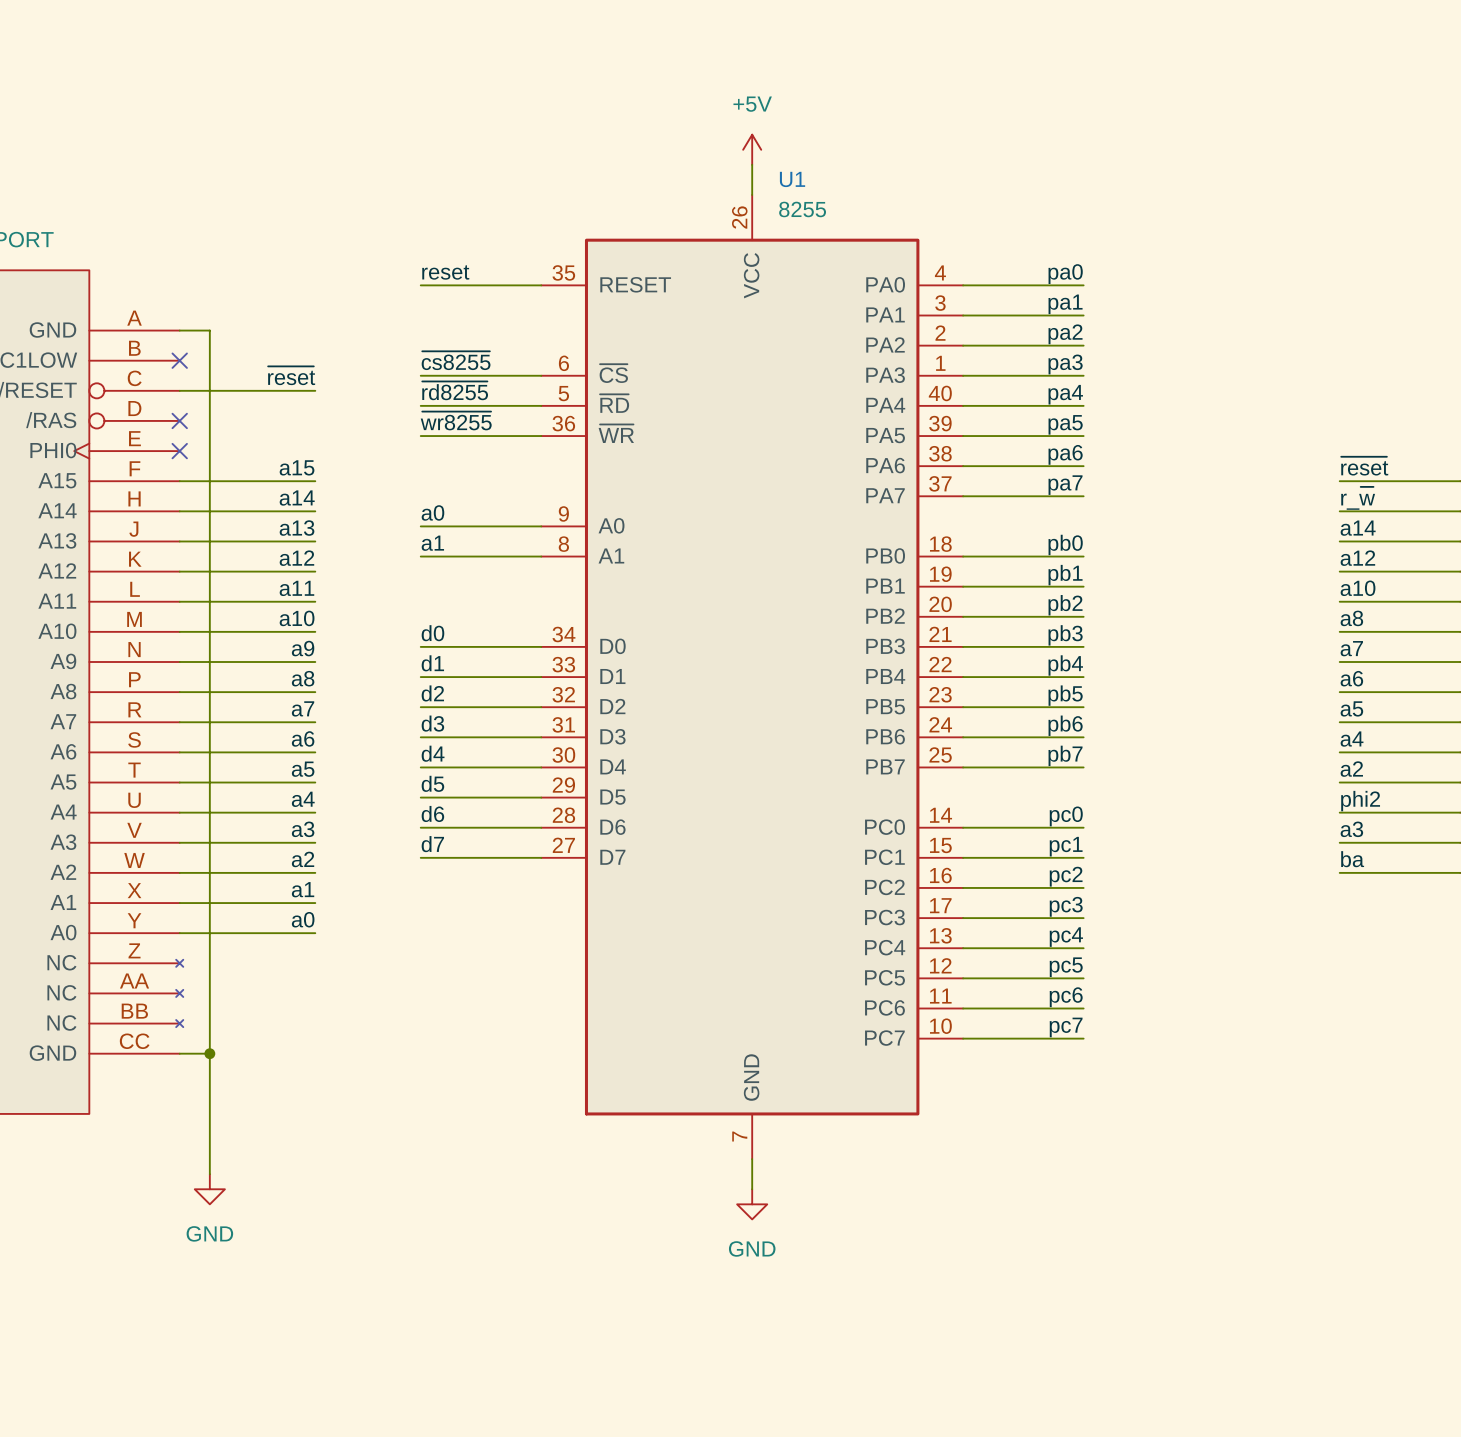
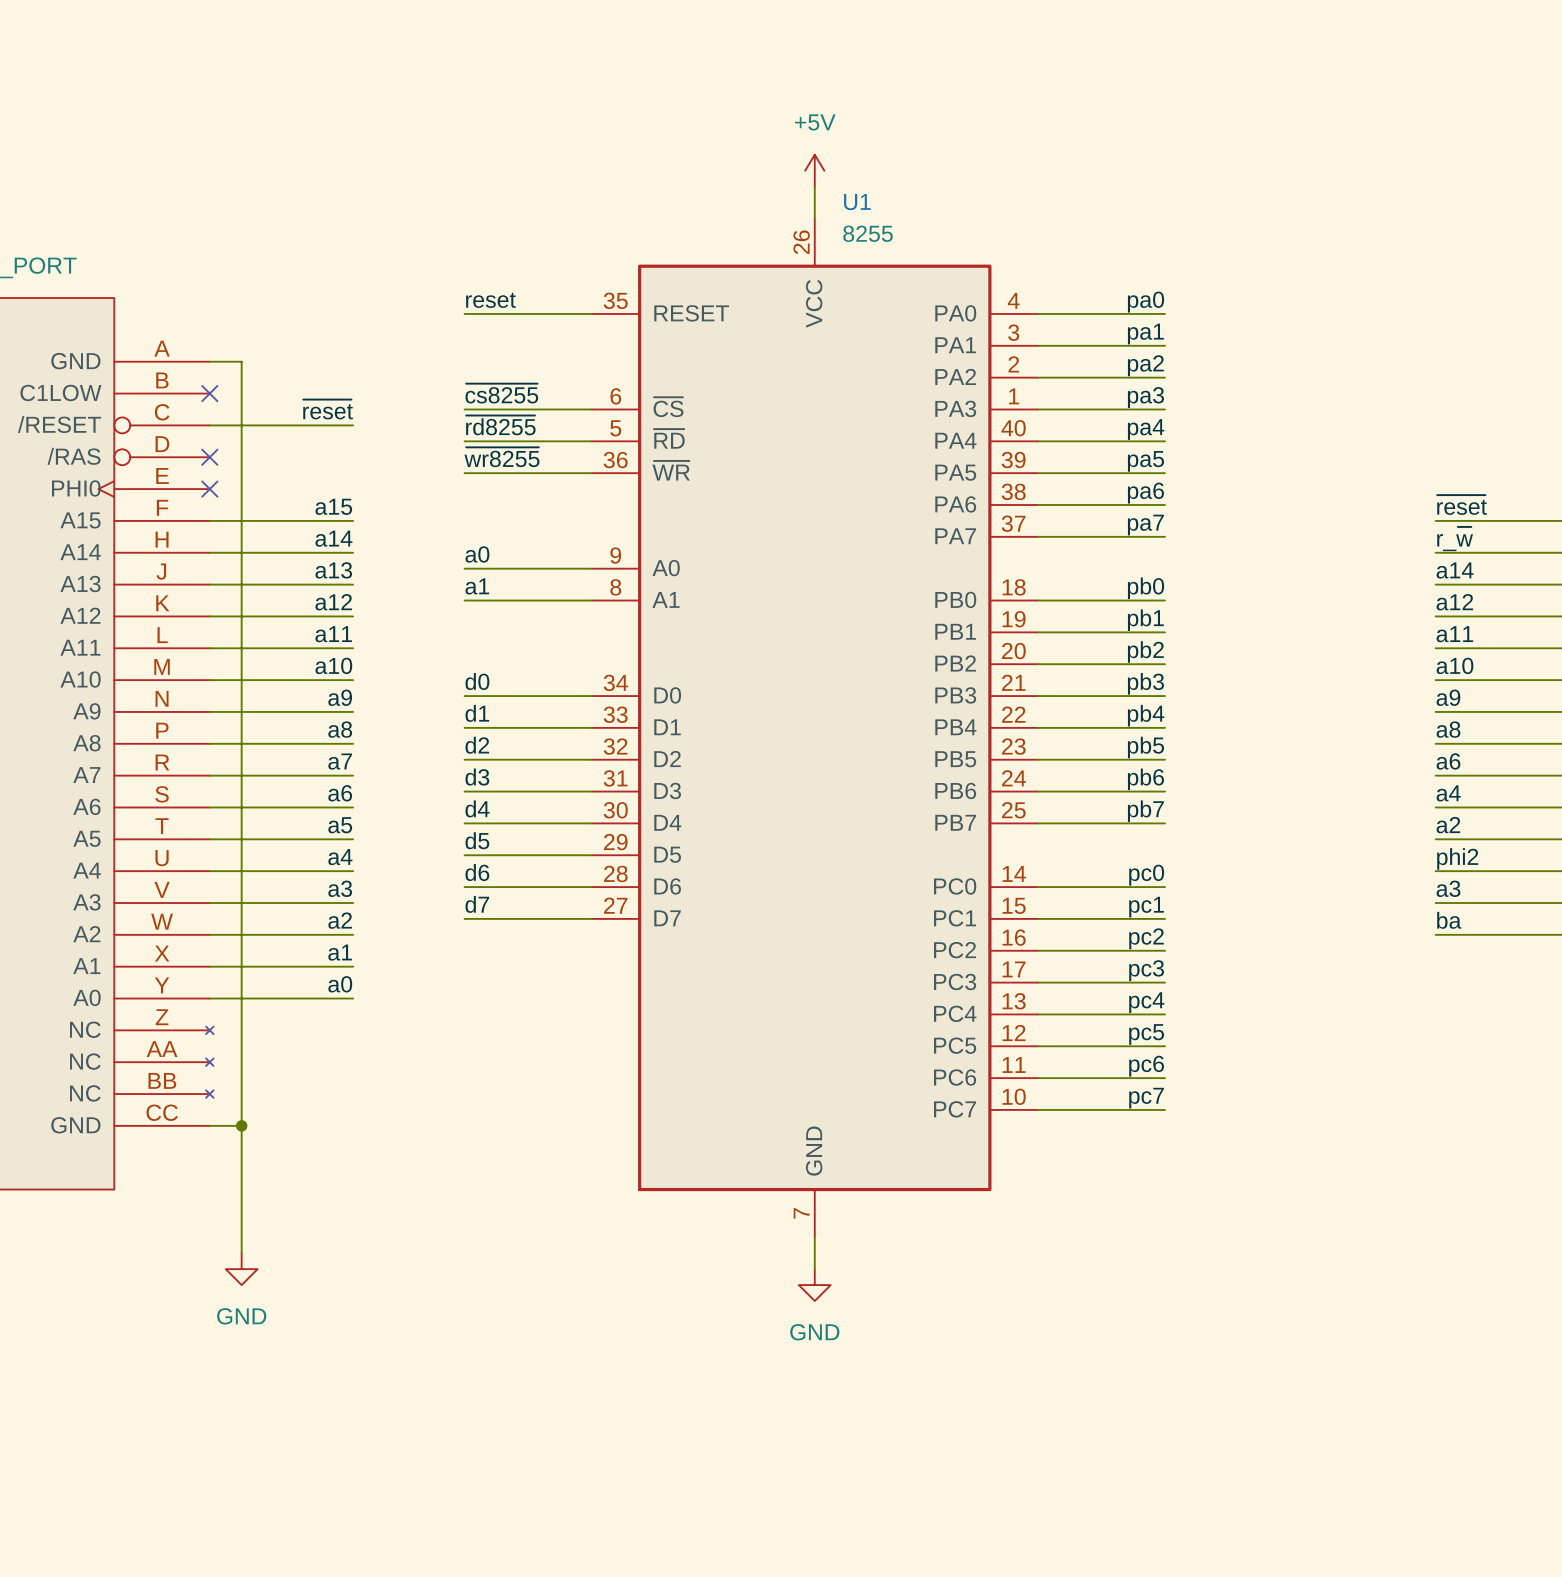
label: a10 (1358, 588) -> a11 (1454, 634)
label: a8 (1351, 618) -> a10 (1454, 665)
label: a7 (1351, 648) -> a9 (1448, 697)
label: a6 (1351, 678) -> a8 (1448, 729)
label: a5 (1351, 708) -> a6 (1448, 761)

